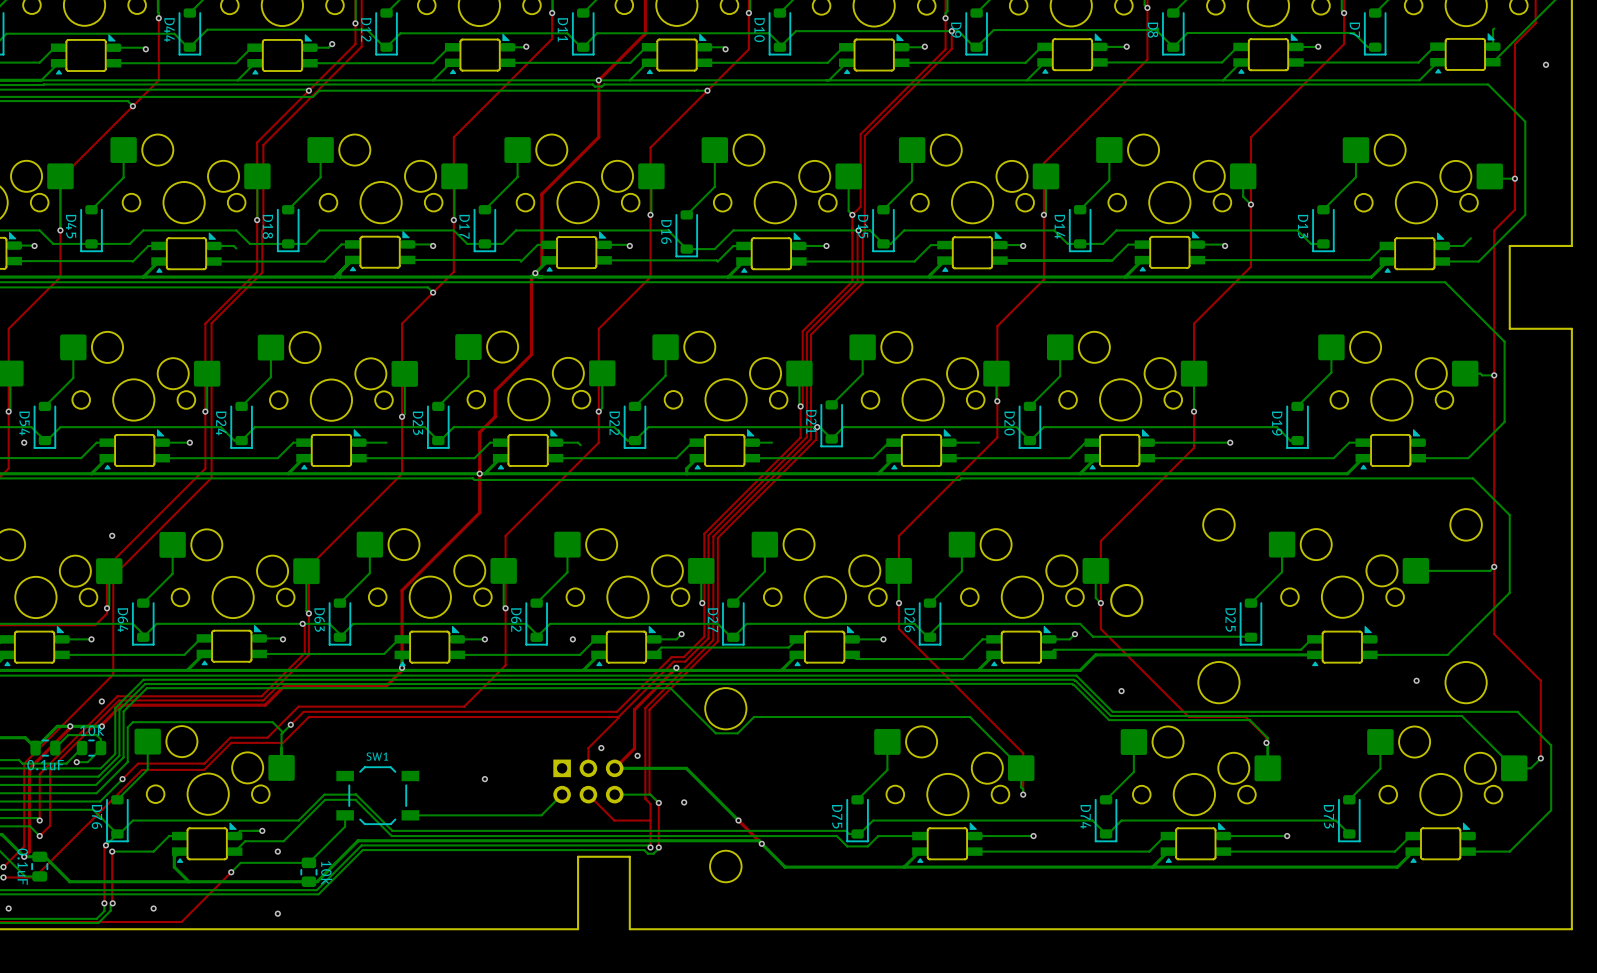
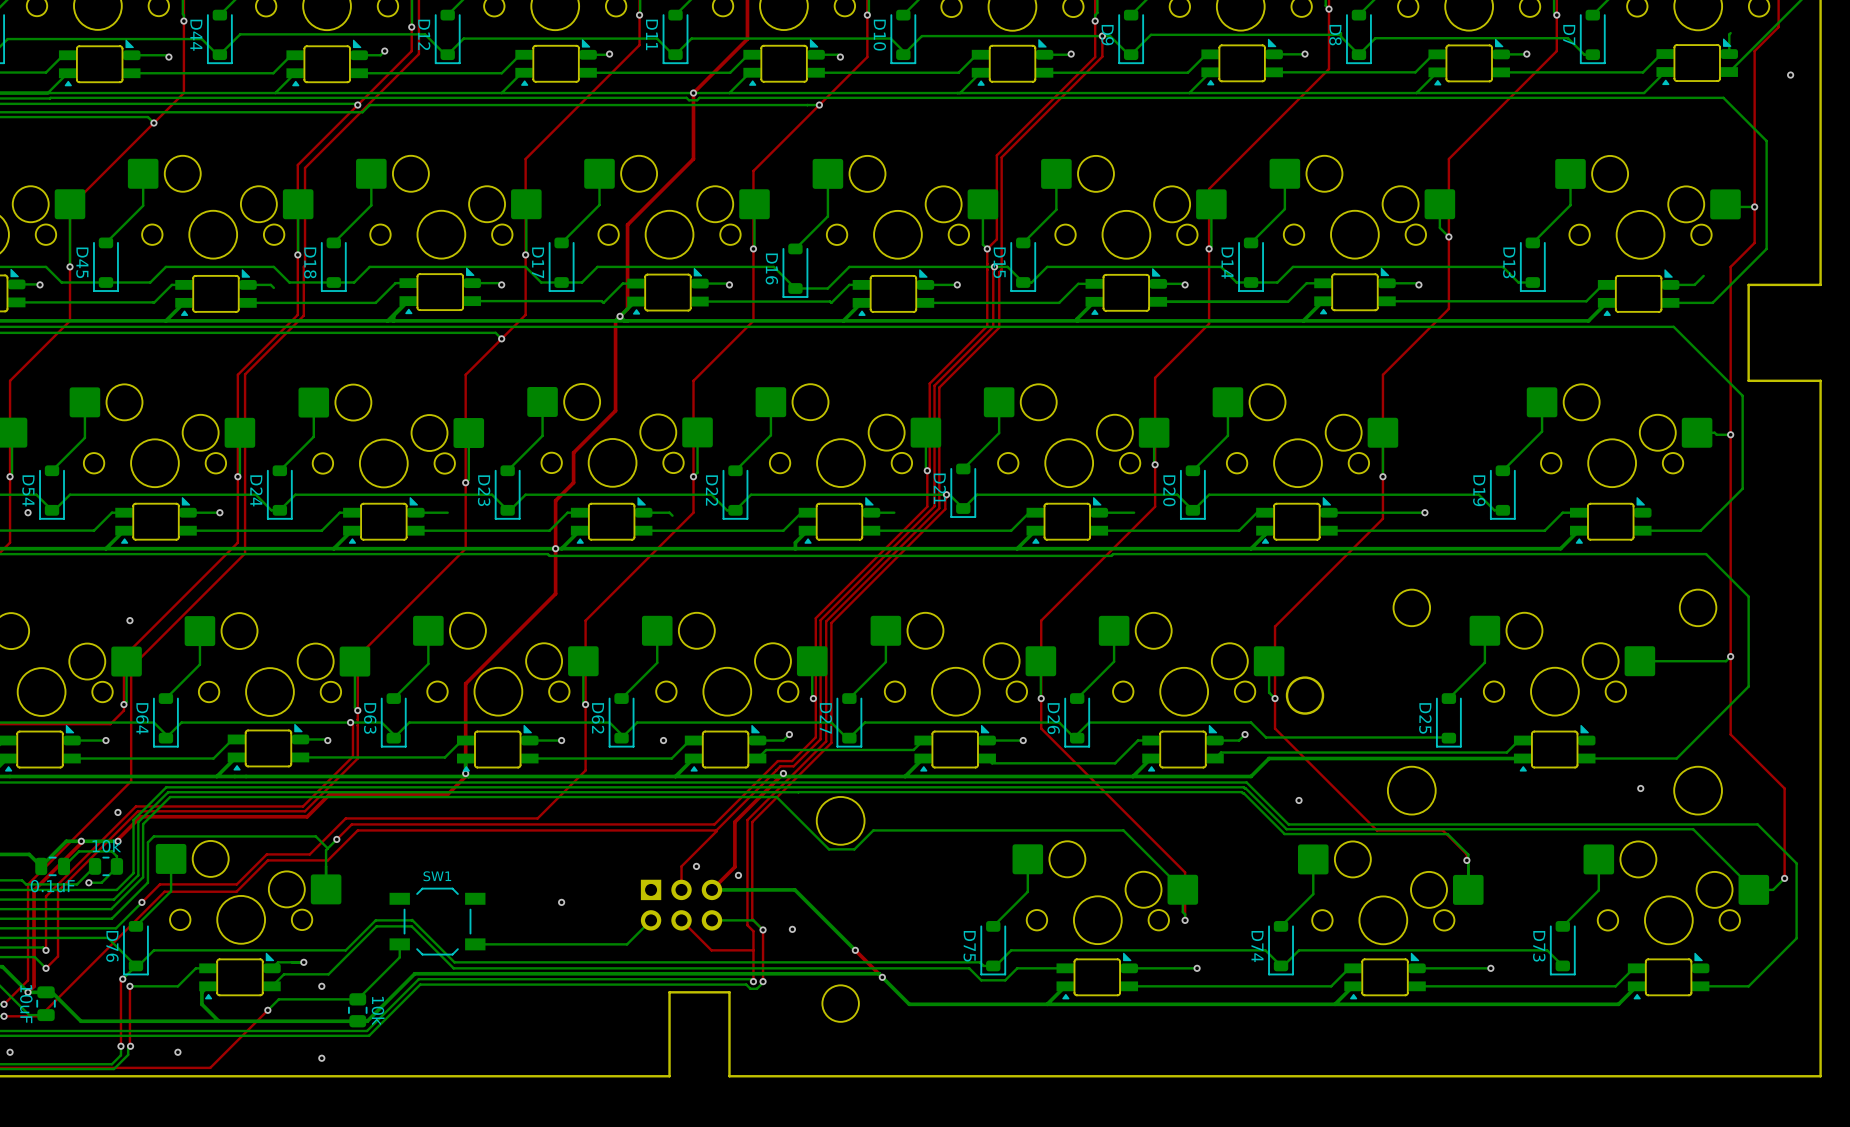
part value: 0.1uF (22, 866) -> 10uF (26, 1004)

